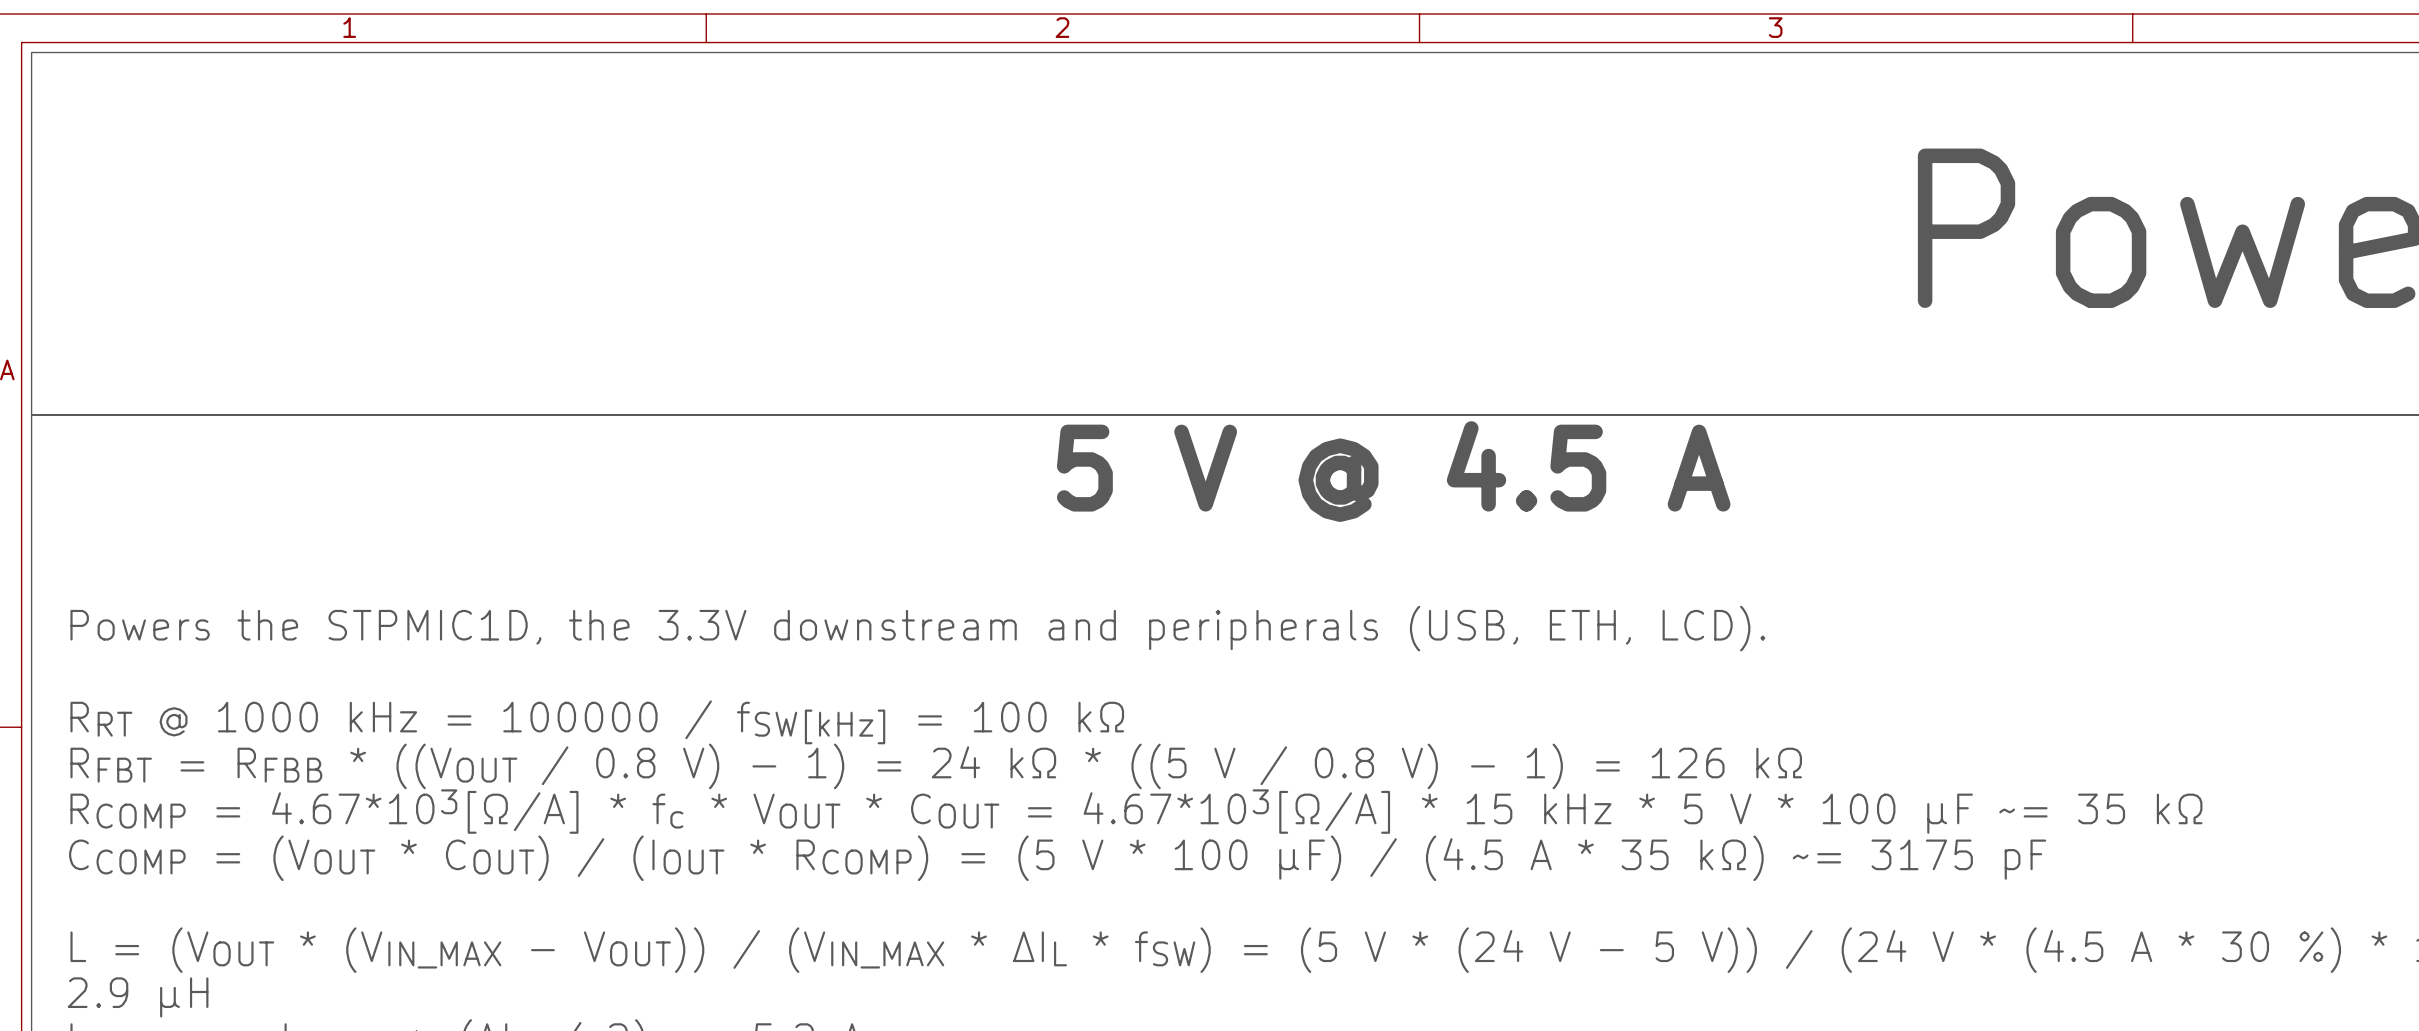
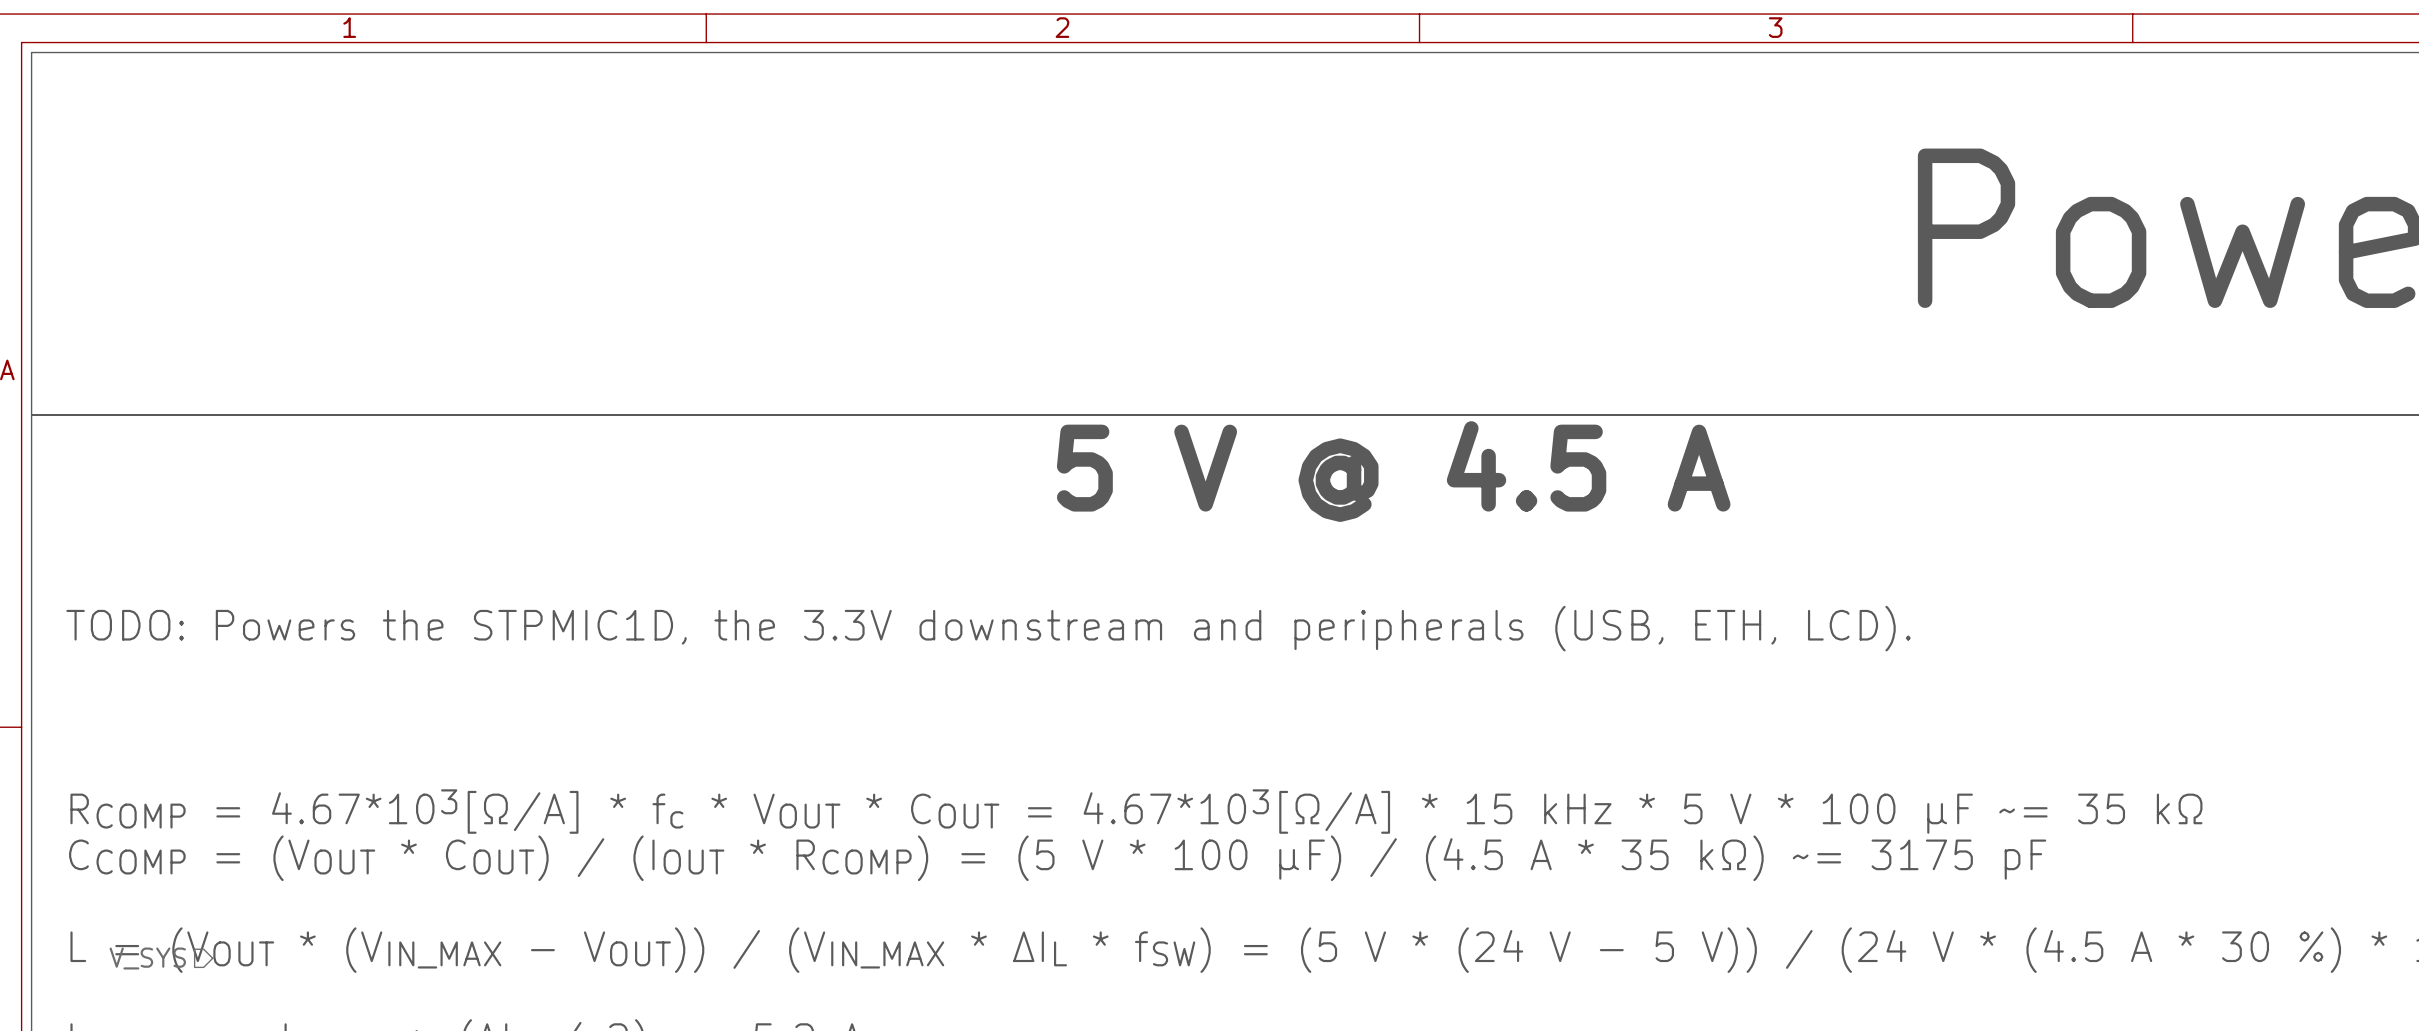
text: Powers the STPMIC1D, the 3.3V downstream and peripherals (USB, ETH, LCD). (917, 628) -> TODO: Powers the STPMIC1D, the 3.3V downstream and peripherals (USB, ETH, LCD). (988, 628)
text: RRT @ 1000 kHz = 100000 / fSW[kHz] = 100 kΩ (597, 722) -> none
text: RFBT = RFBB * ((VOUT / 0.8 V) - 1) = 24 kΩ * ((5 V / 0.8 V) - 1) = 126 kΩ (936, 766) -> none
hierarchical label: none -> V_SYS (147, 958)
text: 2.9 µH (138, 997) -> none

